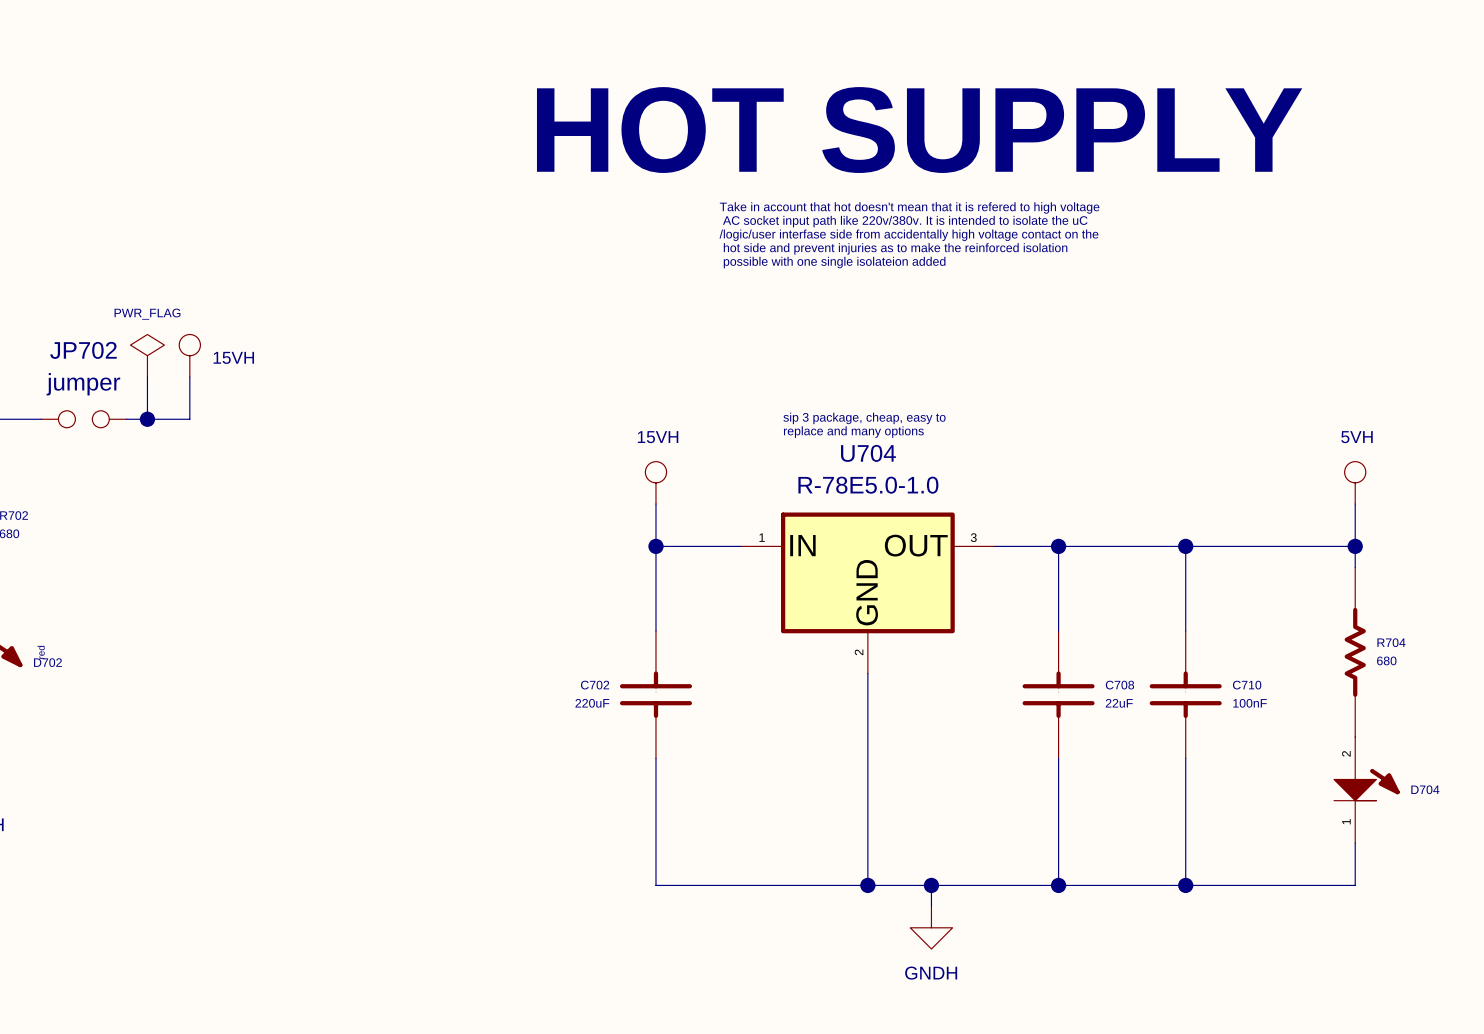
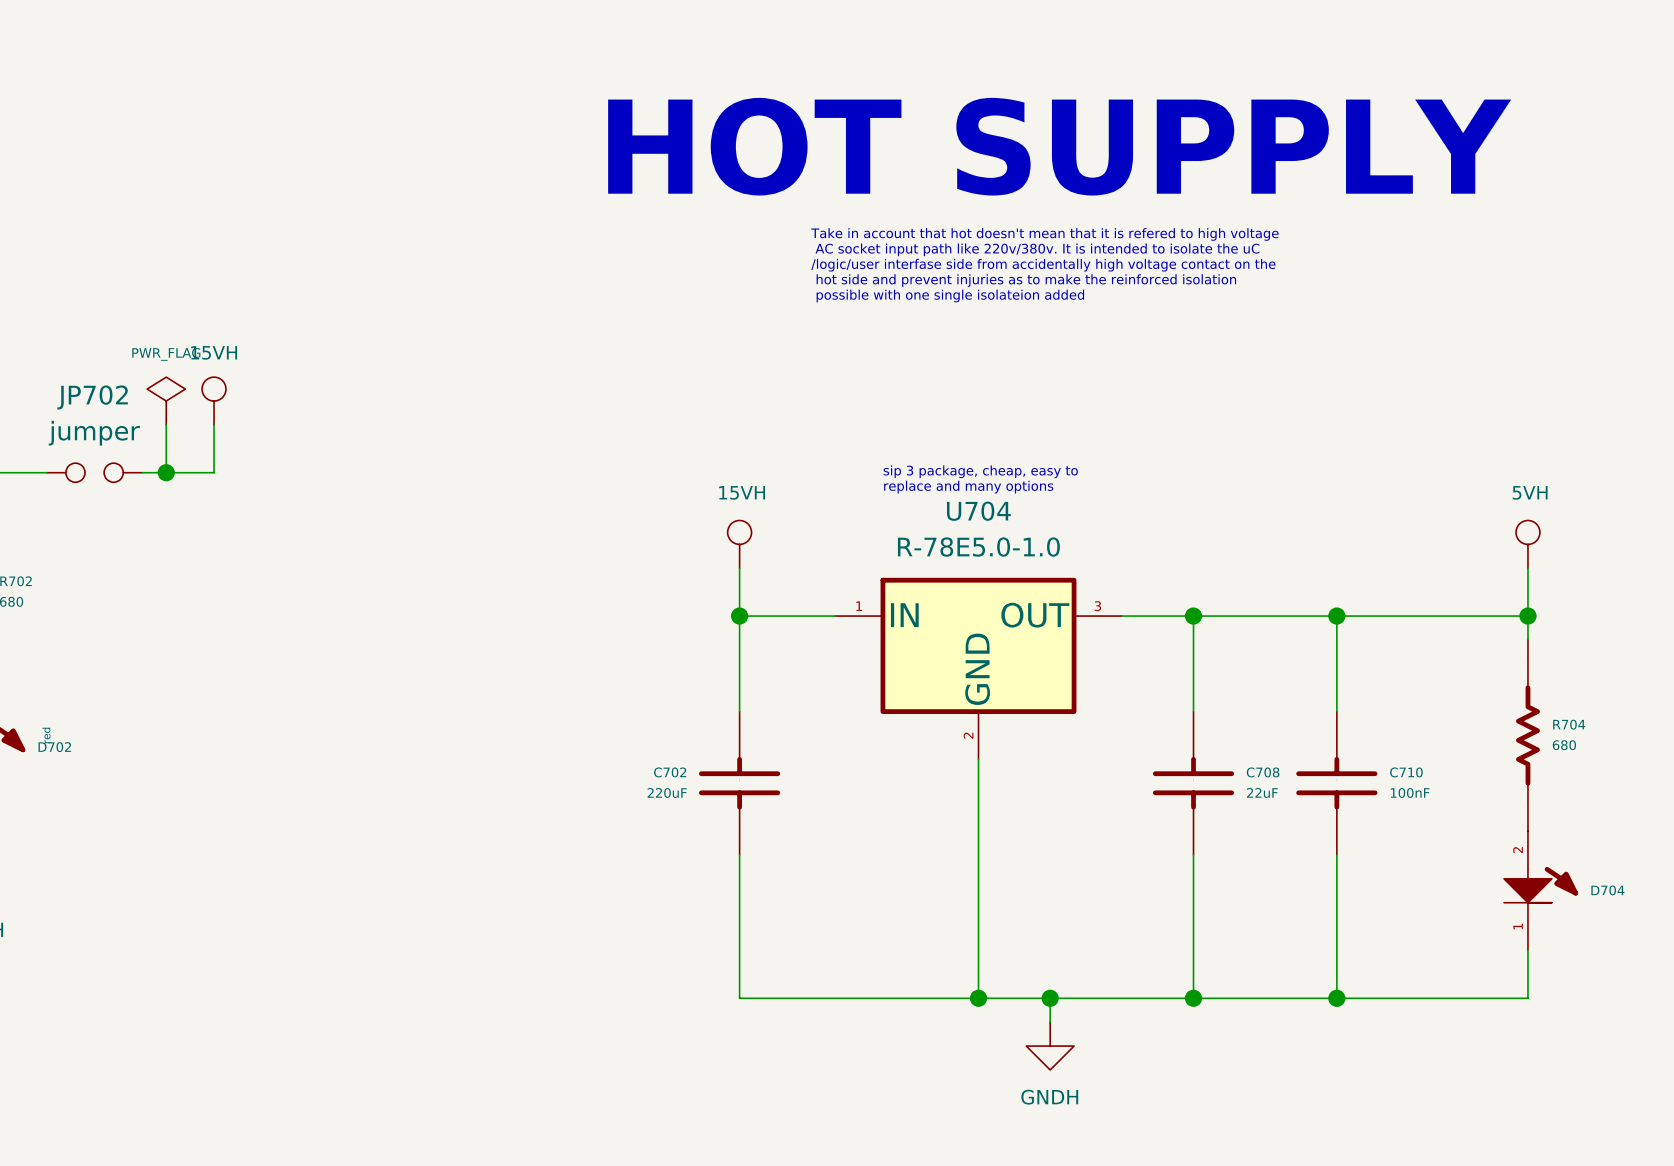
power symbol text position: 15VH (233, 357) -> 15VH (214, 352)

